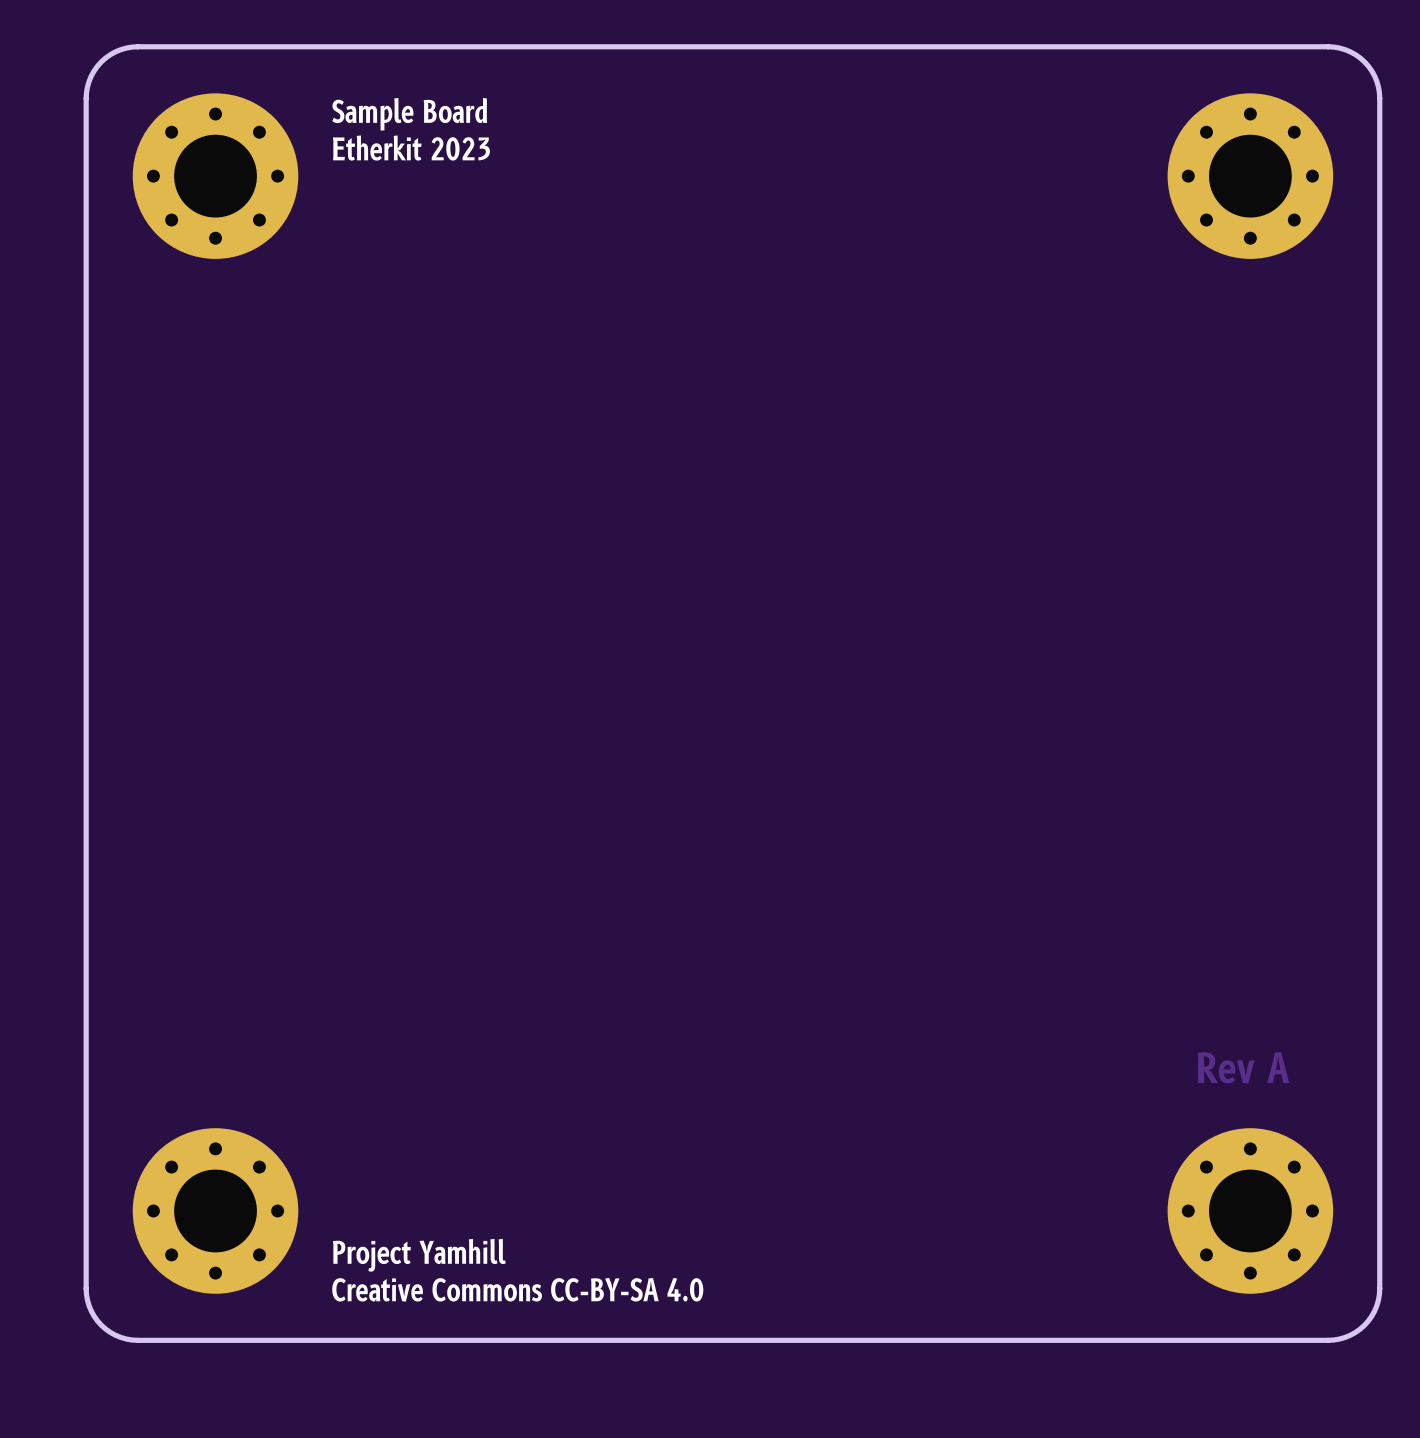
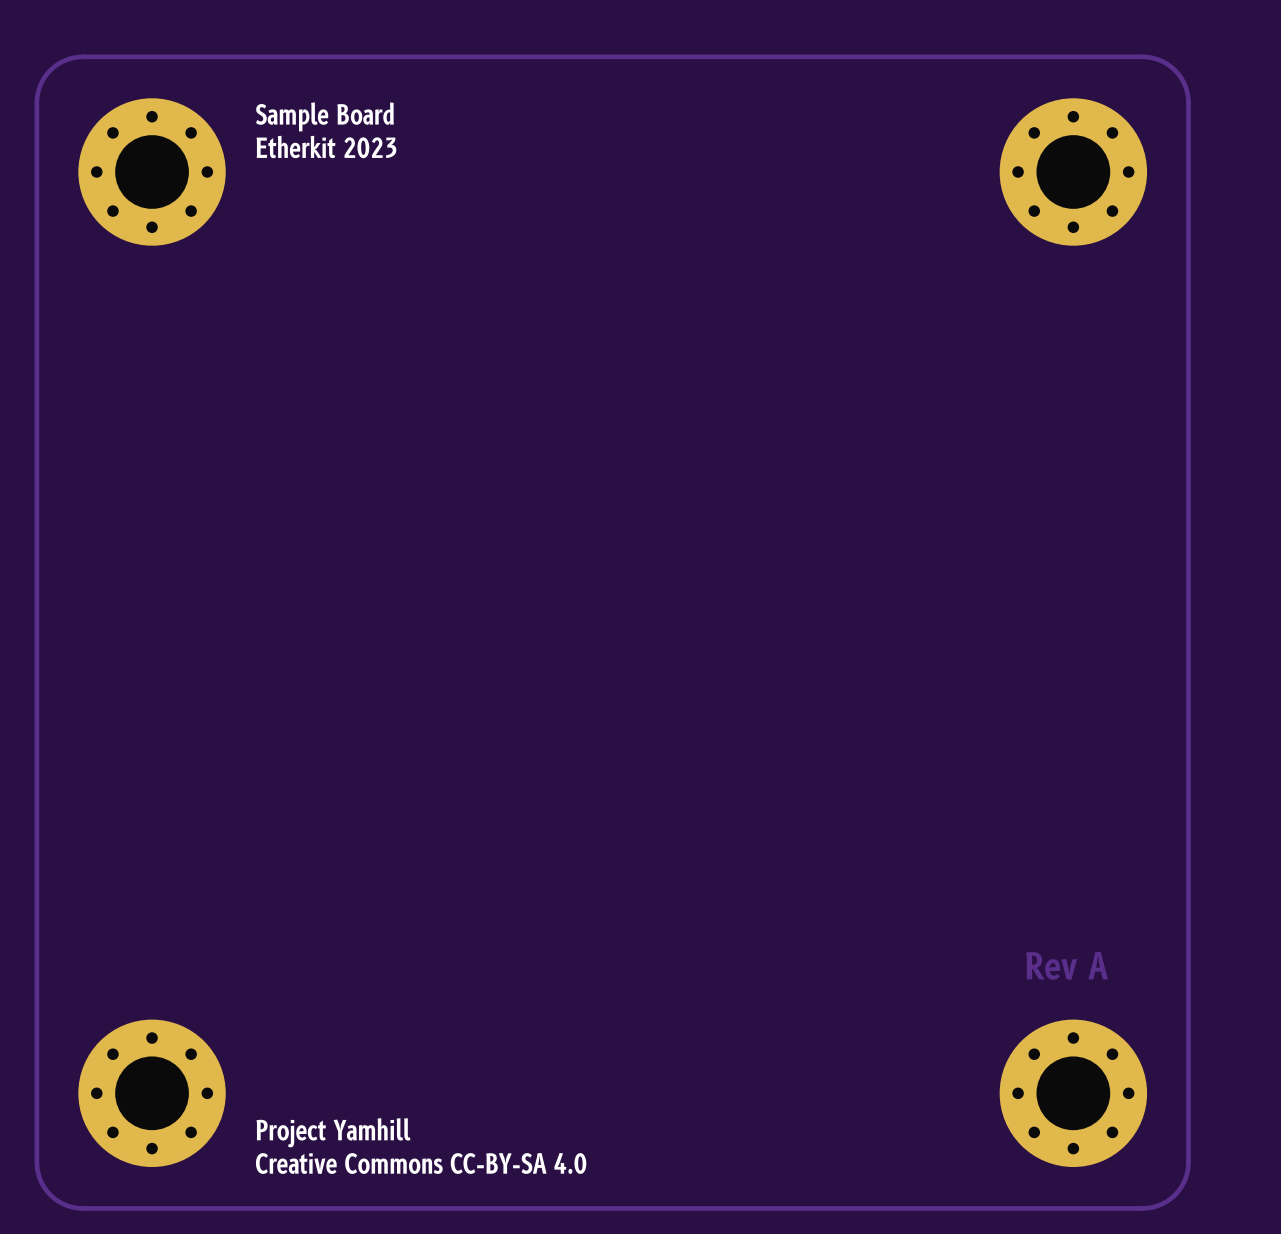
board edge: (137, 46) (1328, 46) (1345, 49) (1364, 61) (1374, 76) (1379, 98) (1379, 1288) (1376, 1305) (1364, 1325) (1345, 1337) (1328, 1340) (137, 1340) (115, 1335) (101, 1325) (89, 1305) (86, 1288) (86, 98) (91, 76) (101, 61) (120, 49) (137, 46) -> none
track: none -> (82, 56) (1142, 56) (1157, 59) (1175, 70) (1183, 82) (1188, 102) (1188, 1162) (1185, 1177) (1175, 1194) (1157, 1205) (1142, 1208) (82, 1208) (62, 1203) (50, 1194) (39, 1177) (36, 1162) (36, 102) (41, 82) (50, 70) (67, 59) (82, 56)

